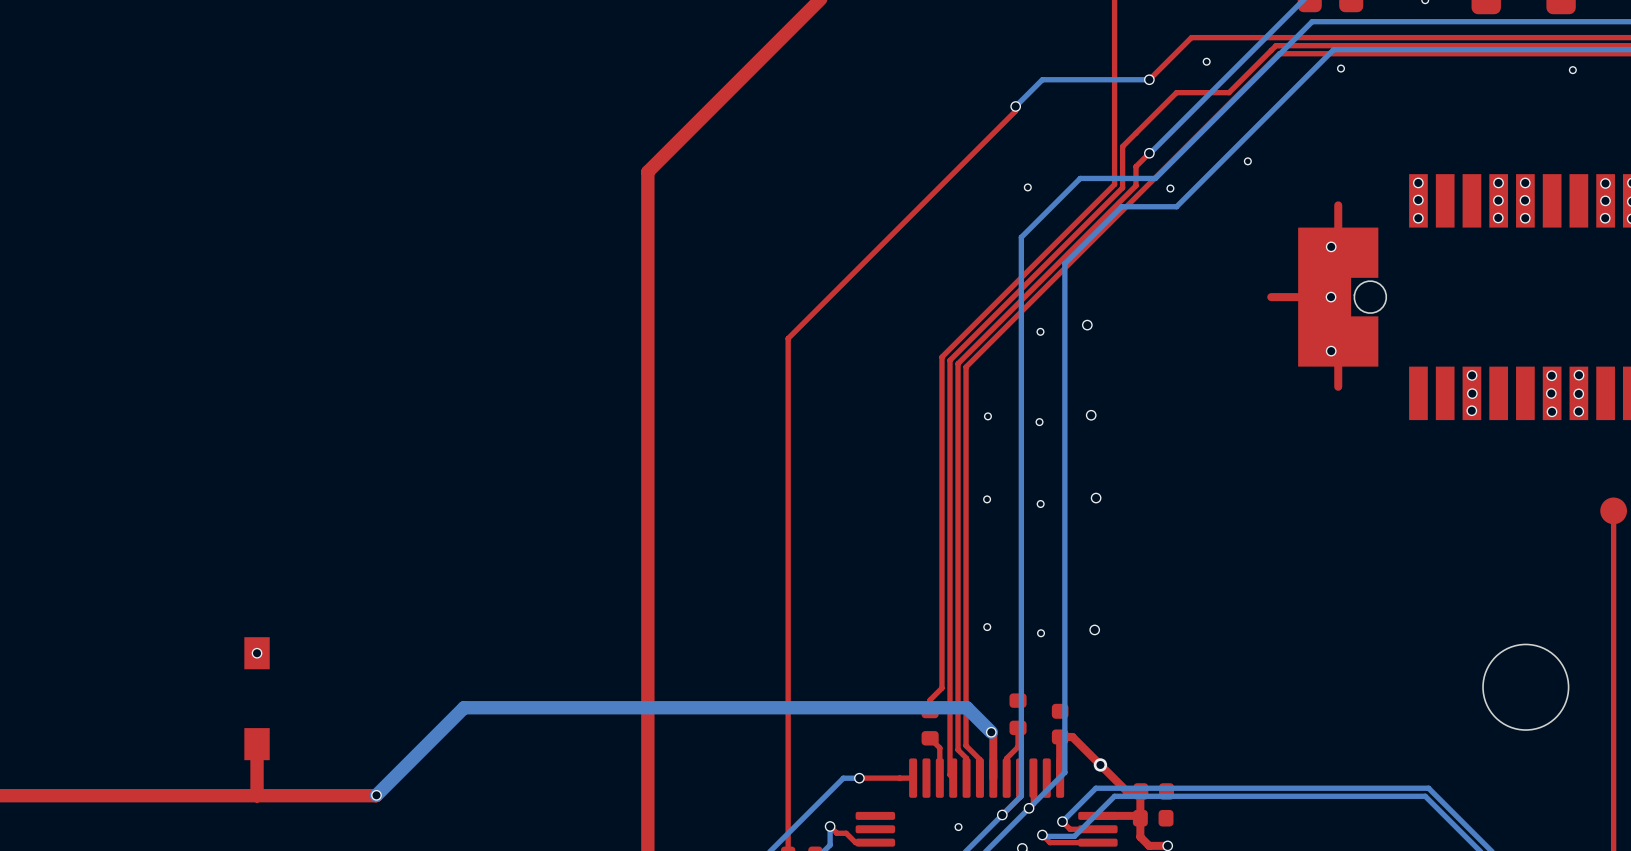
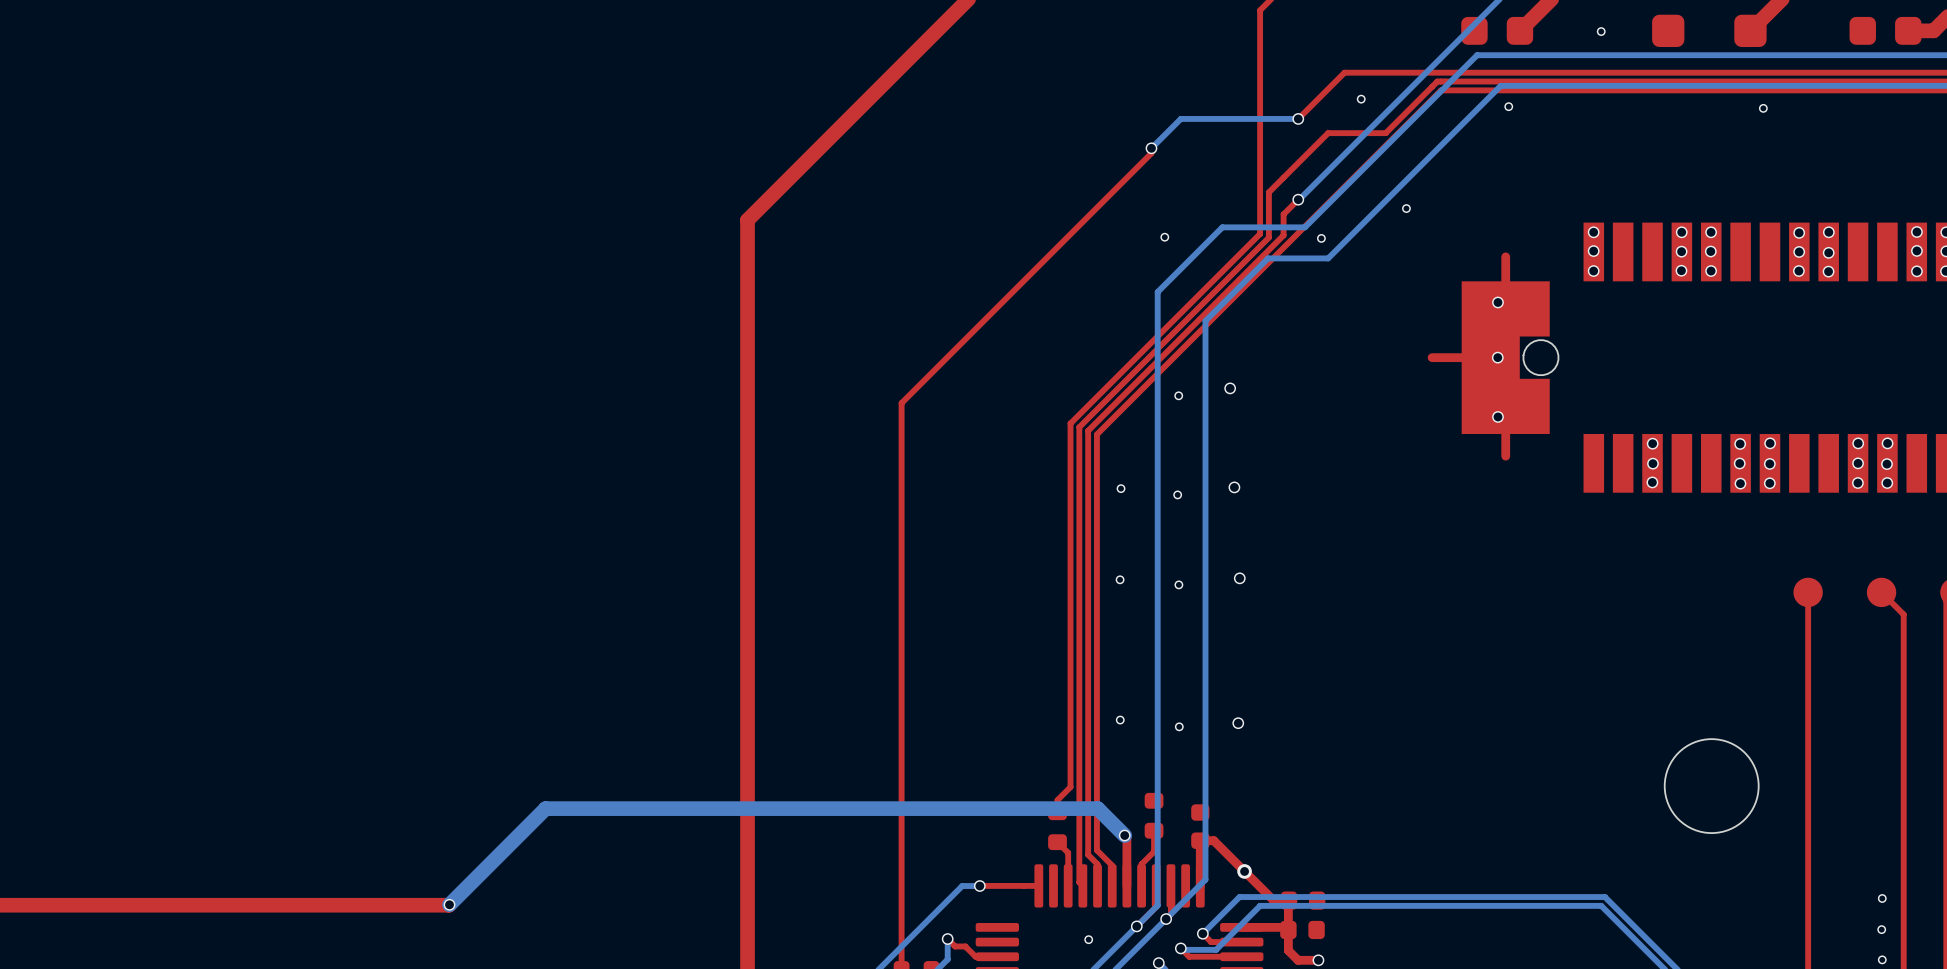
via: (257, 653) -> none
part: (257, 698) -> none
top track: (257, 744) (257, 795) -> none

